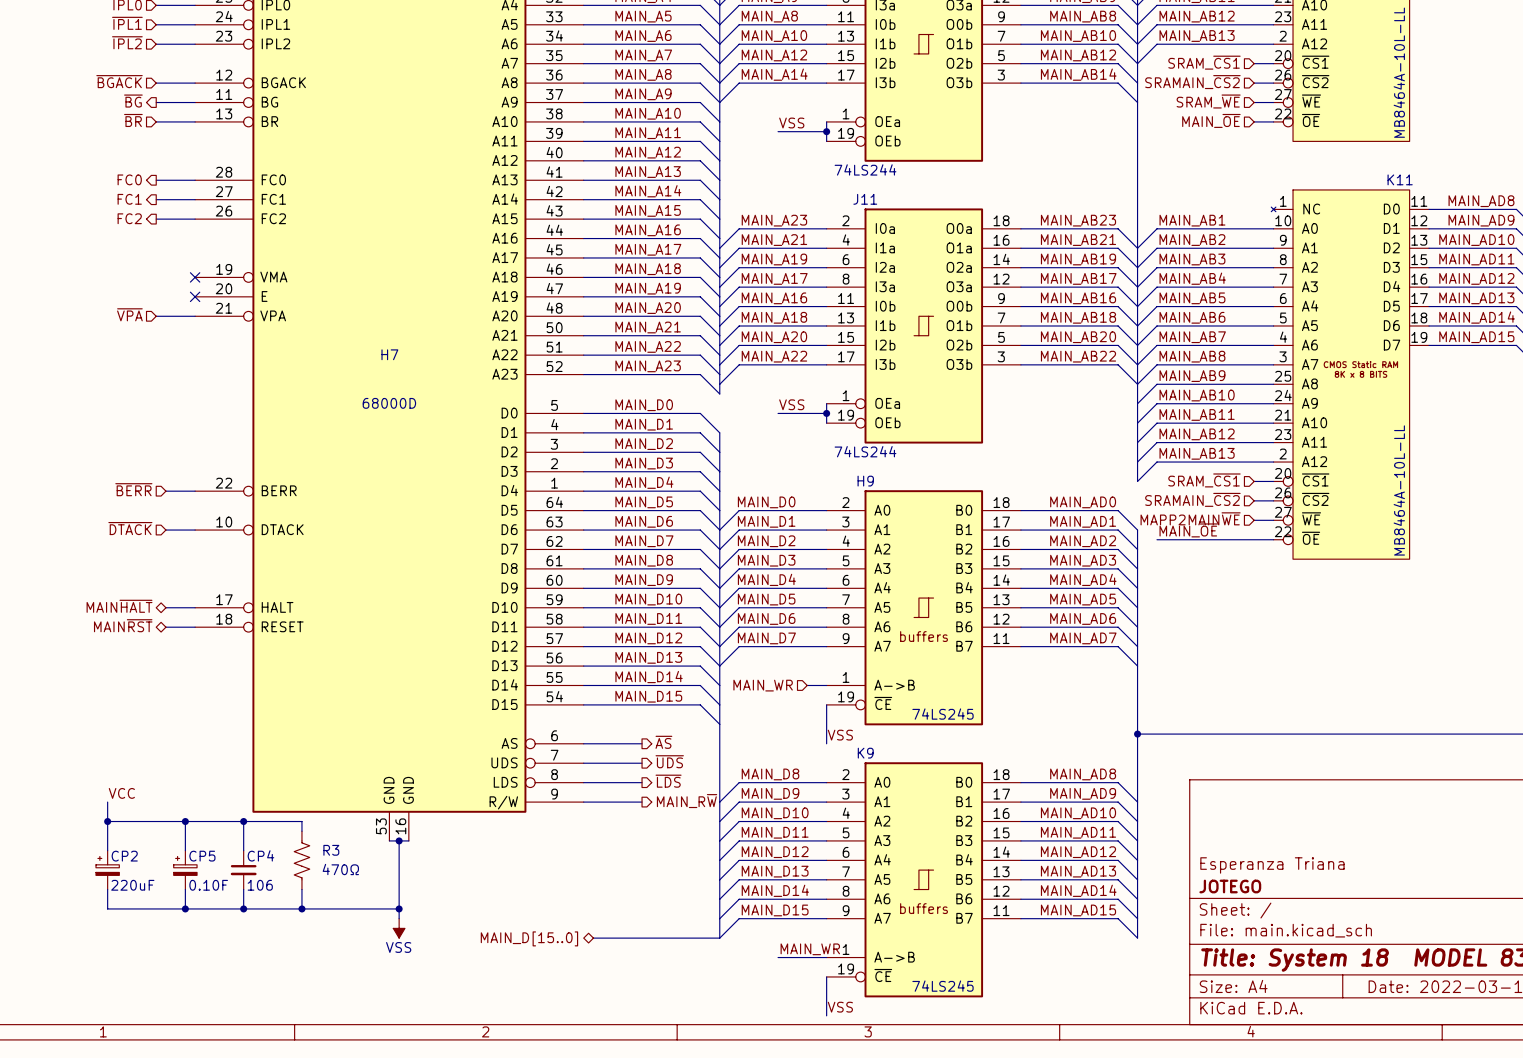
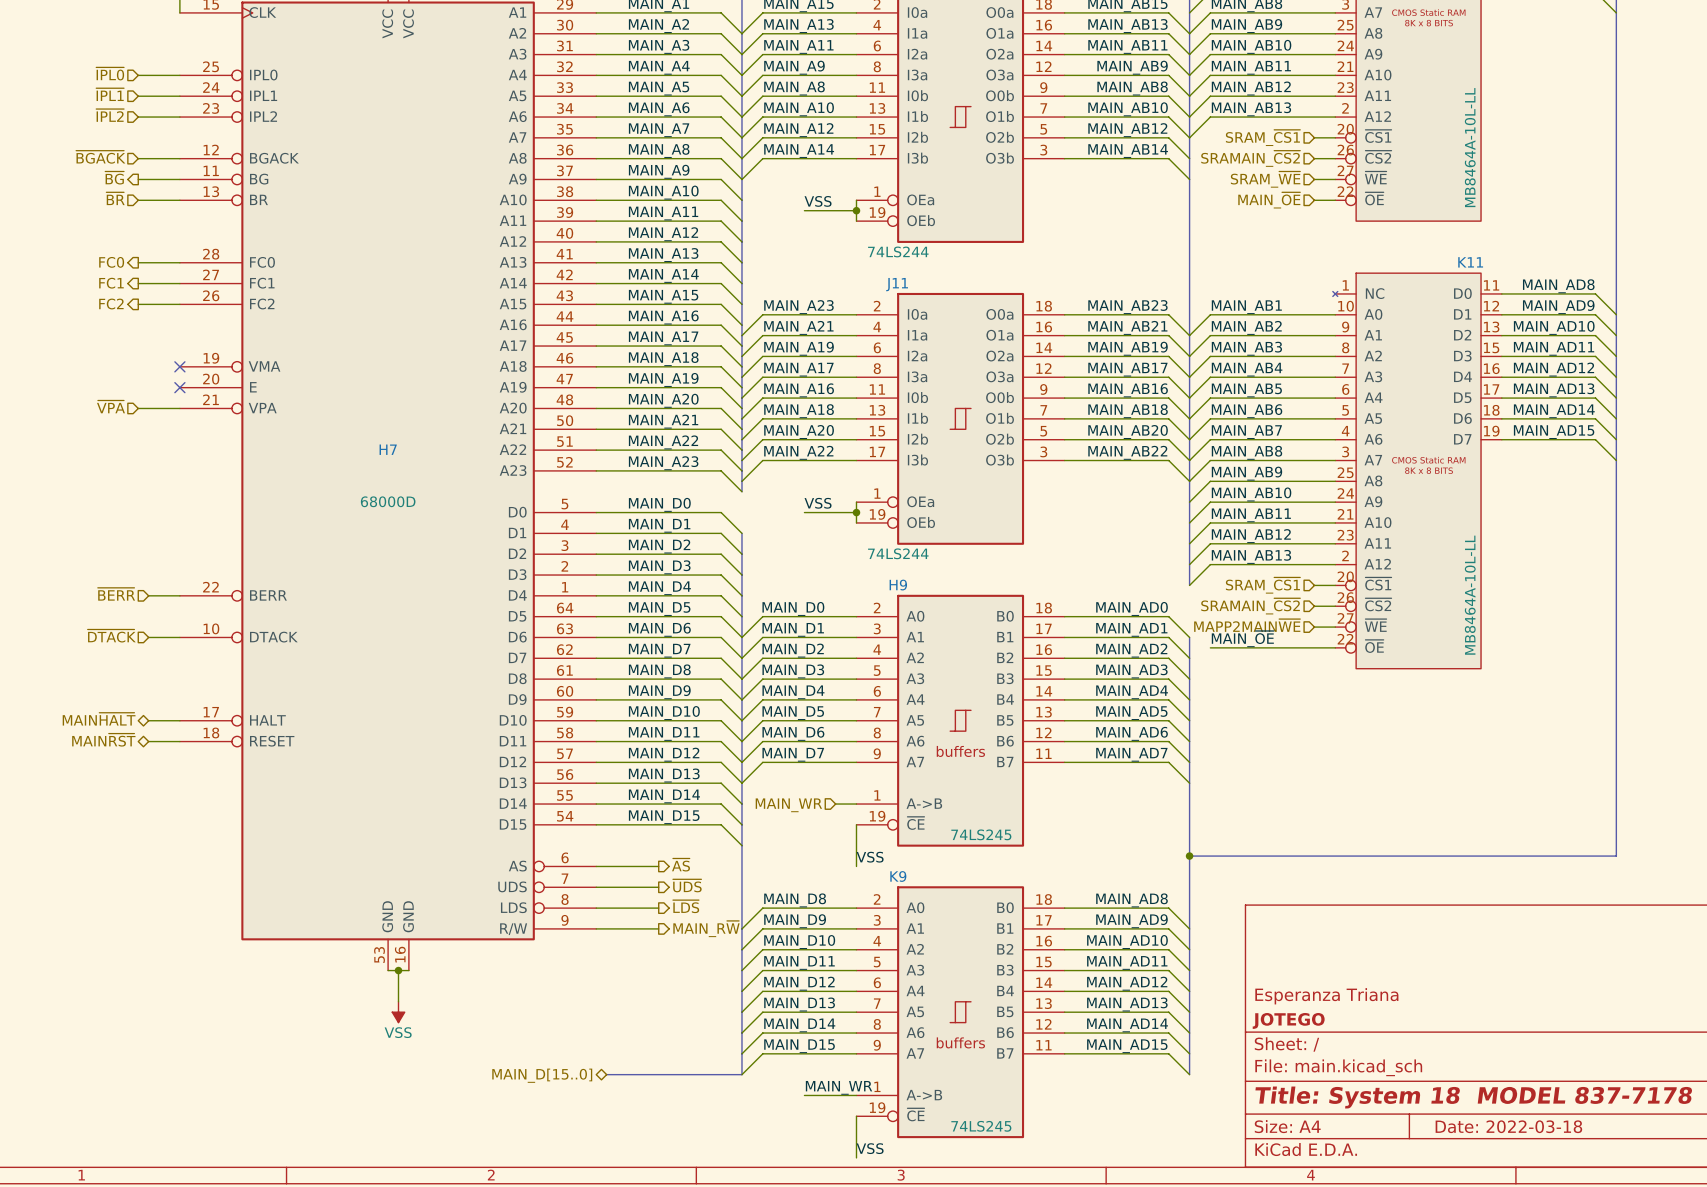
label: VCC (121, 793) -> none
wire: (107, 802) (107, 850) -> none
wire: (107, 821) (301, 821) (301, 831) -> none
junction: (107, 821) -> none
wire: (185, 821) (185, 850) -> none
junction: (185, 821) -> none
wire: (243, 821) (243, 850) -> none
junction: (243, 821) -> none
R3: 470Ω (301, 860) -> none
CP2: 220uF (107, 870) -> none
CP5: 0.10F (185, 870) -> none
CP4: 106 (243, 870) -> none
wire: (399, 870) (399, 918) -> none
wire: (107, 889) (107, 908) (399, 908) -> none
wire: (185, 889) (185, 908) -> none
wire: (243, 889) (243, 908) -> none
wire: (301, 889) (301, 908) -> none
junction: (185, 908) -> none
junction: (243, 908) -> none
junction: (301, 908) -> none
junction: (399, 908) -> none
power symbol position: VSS (399, 928) -> VSS (398, 1012)

